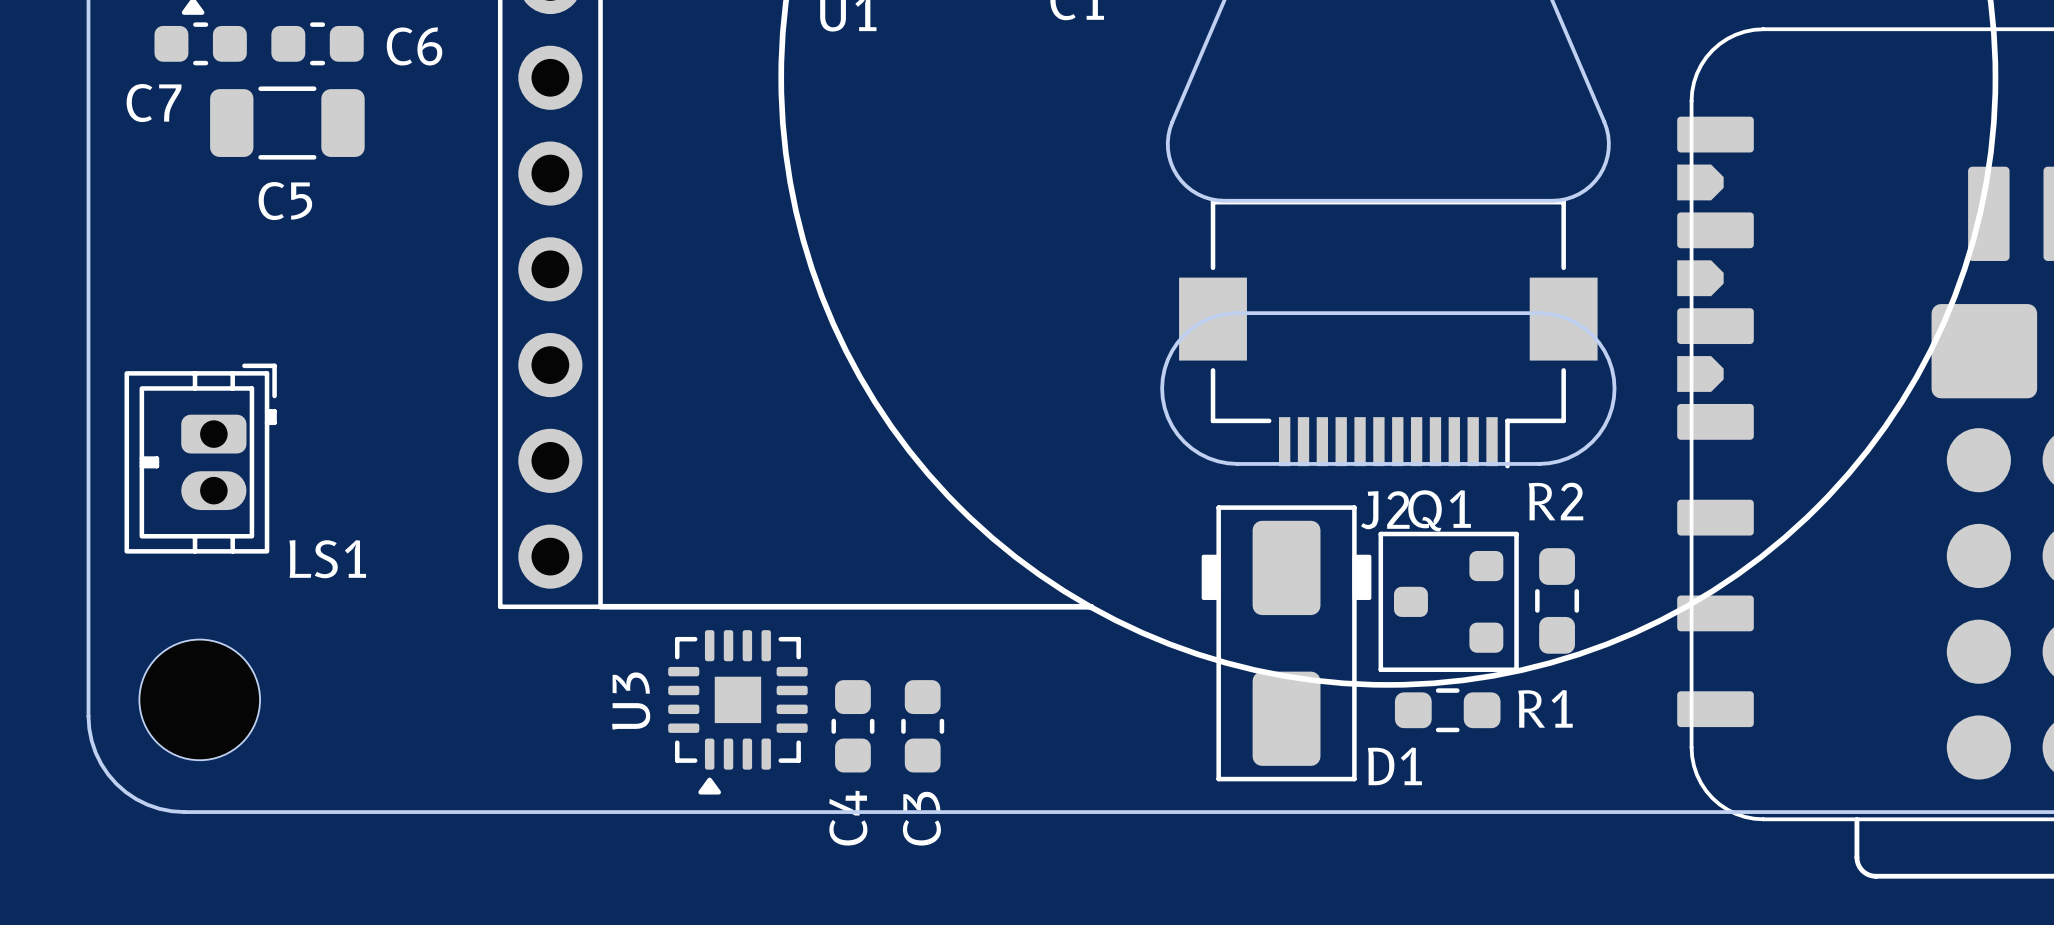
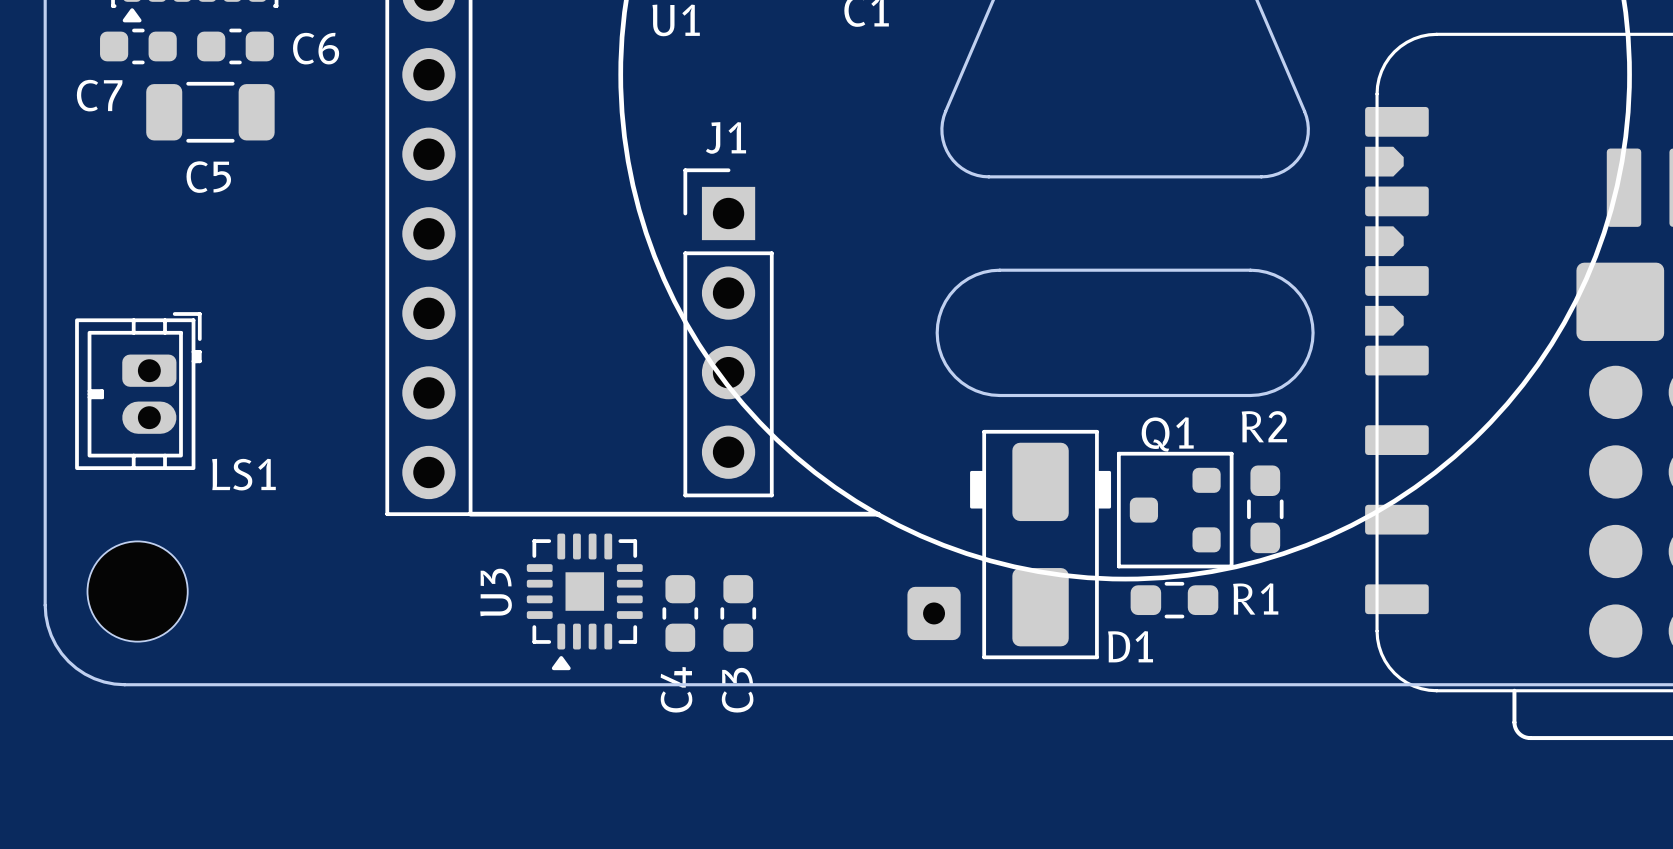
J2: (1388, 334) -> none
J1: none -> (728, 332)
part: none -> (934, 613)

